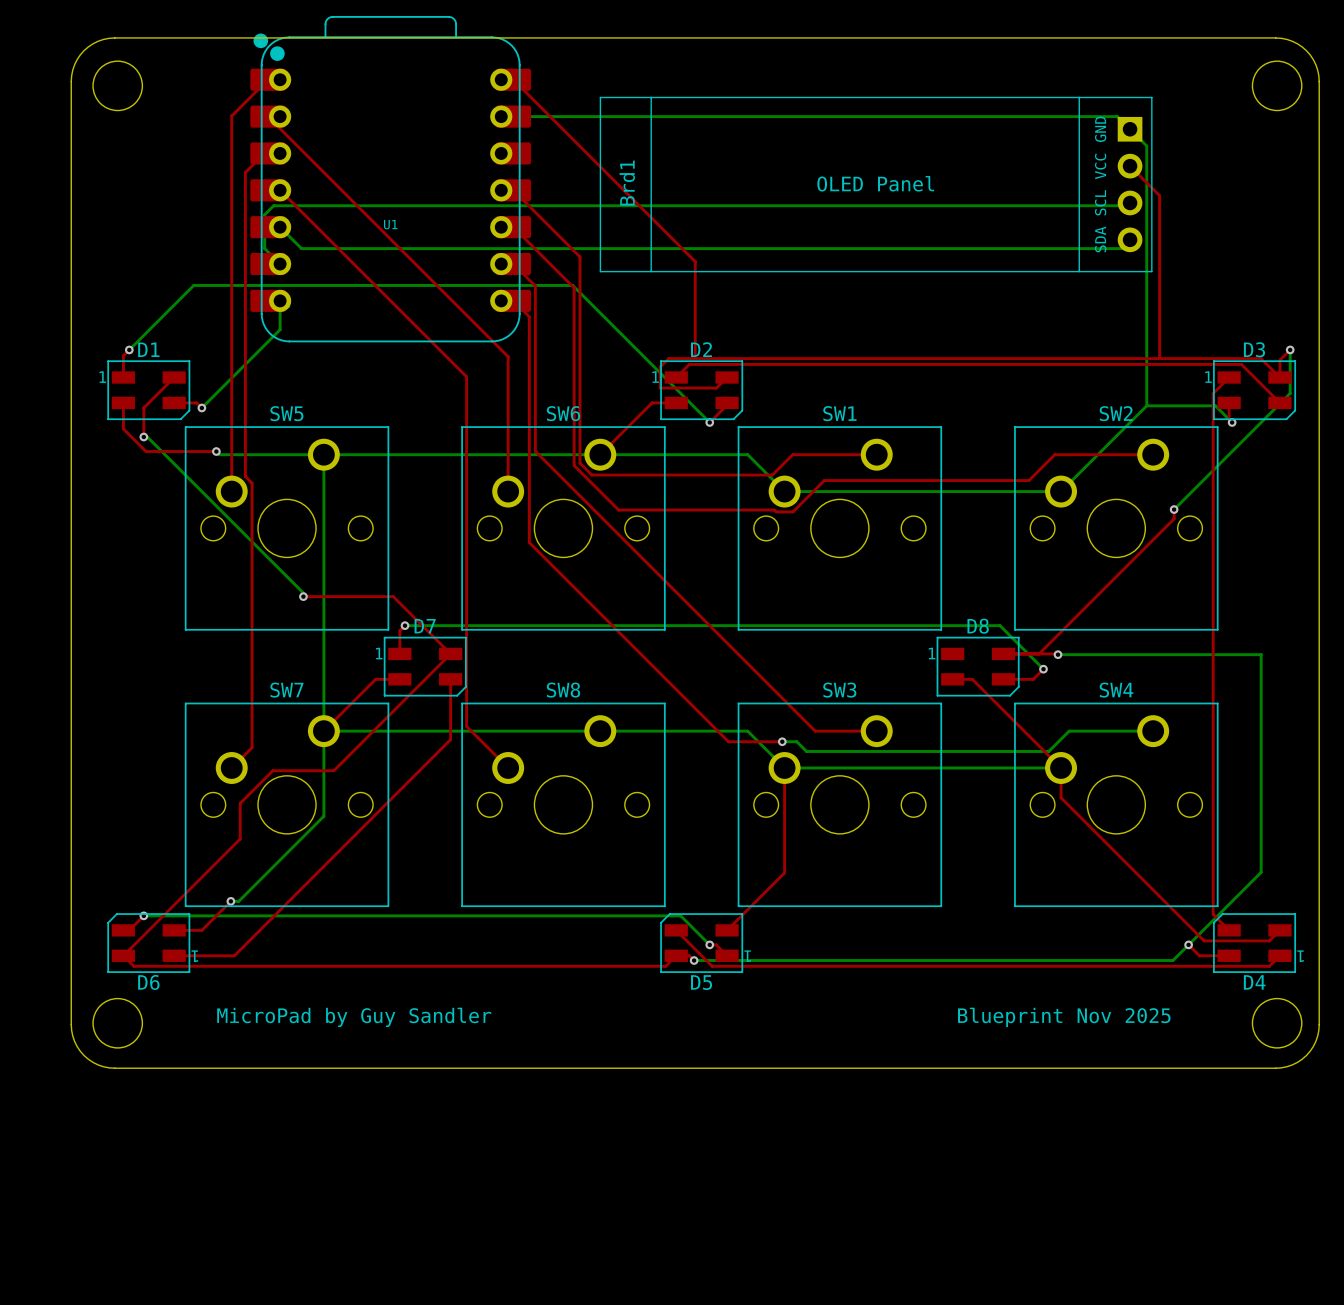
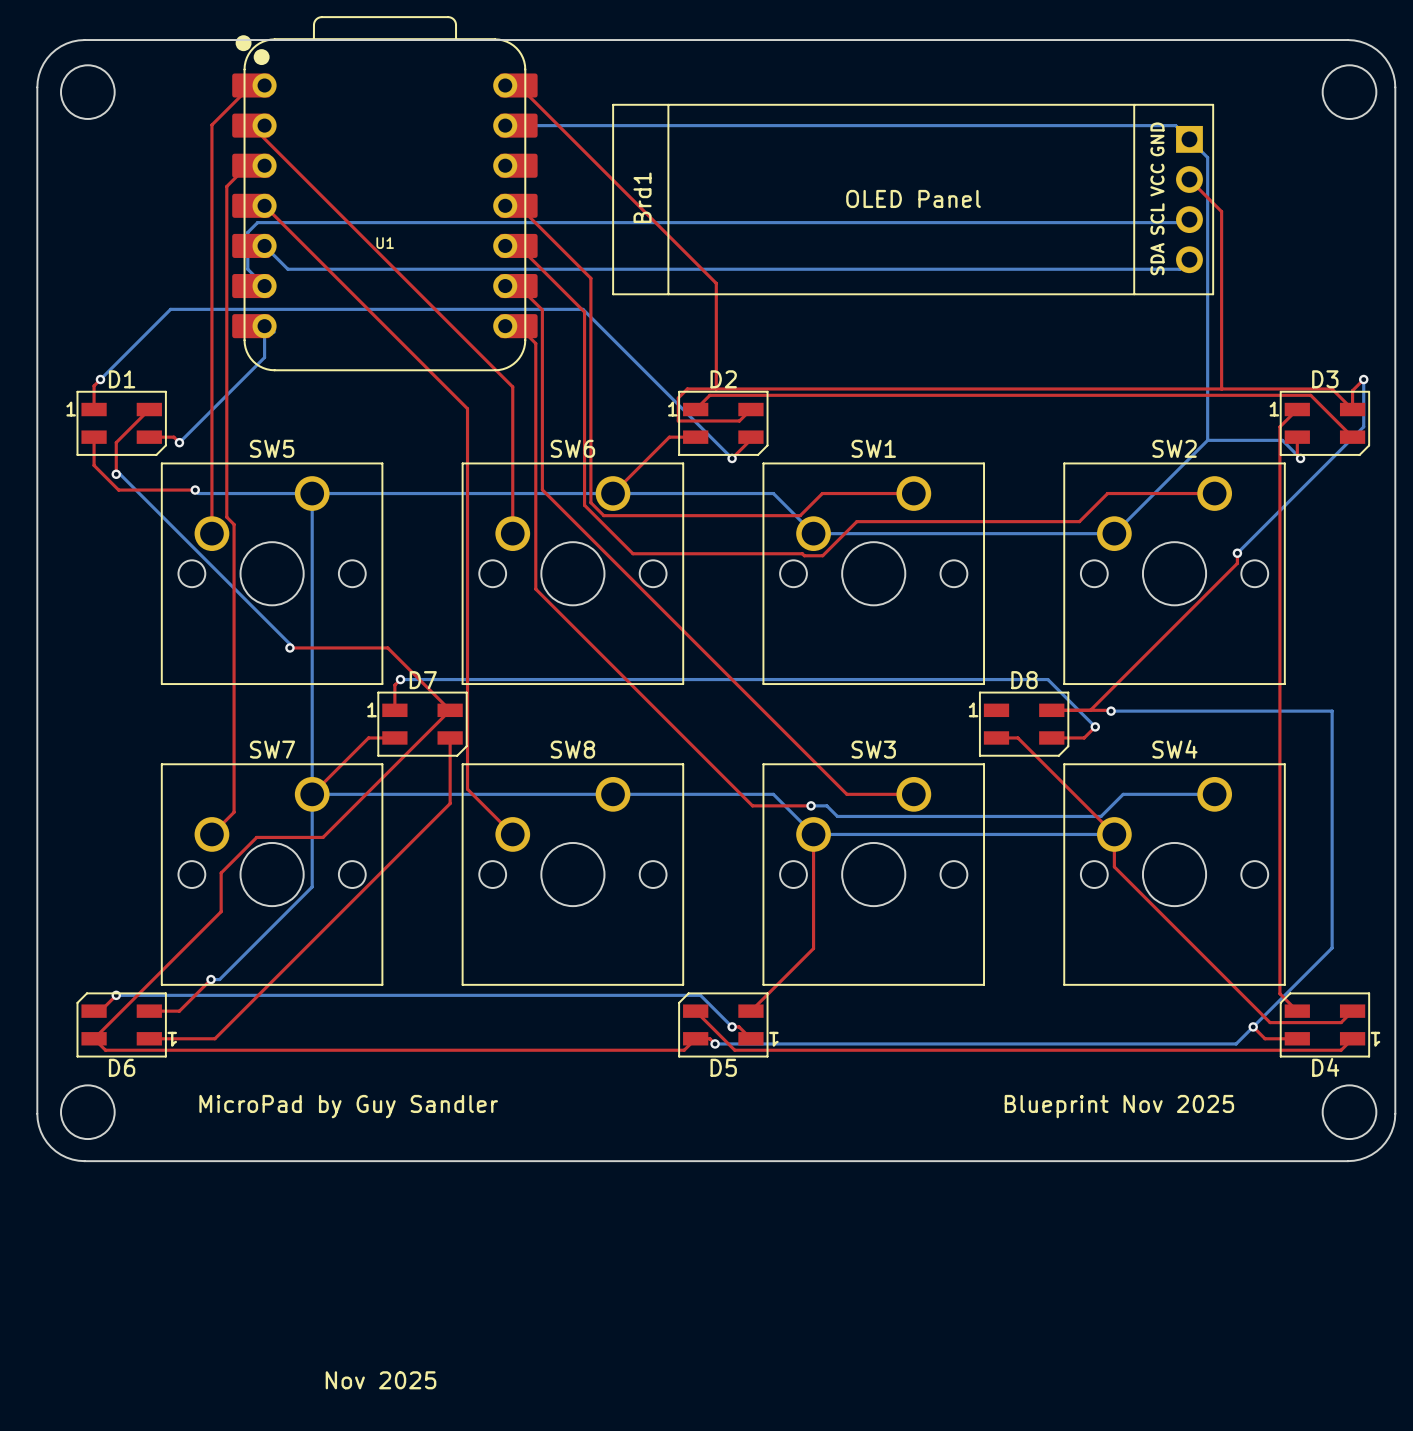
text: none -> Nov 2025 (381, 1380)

